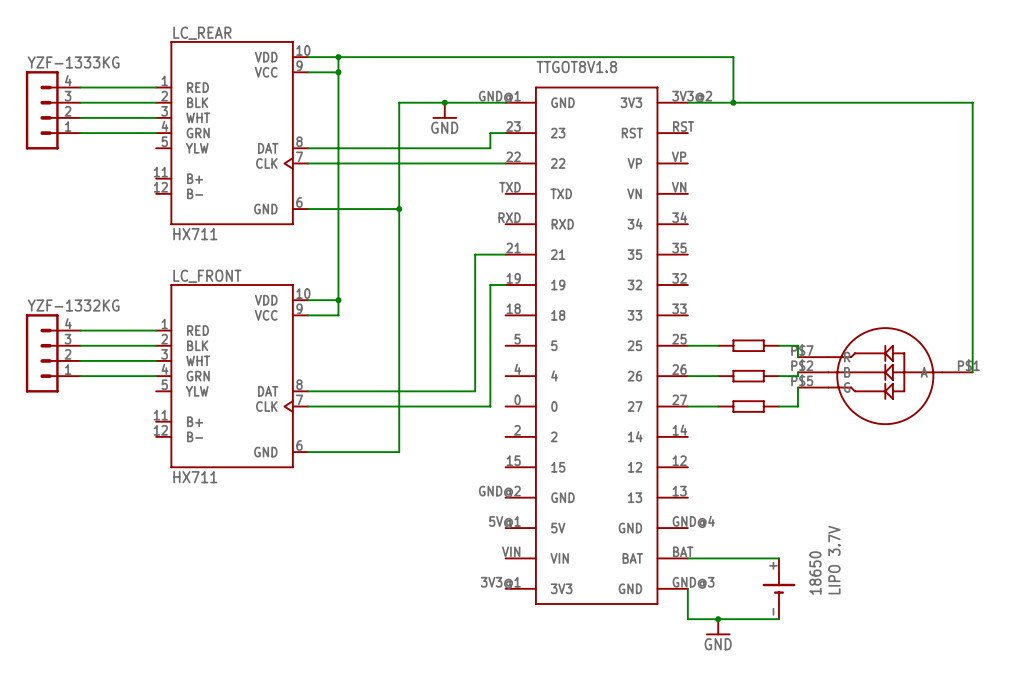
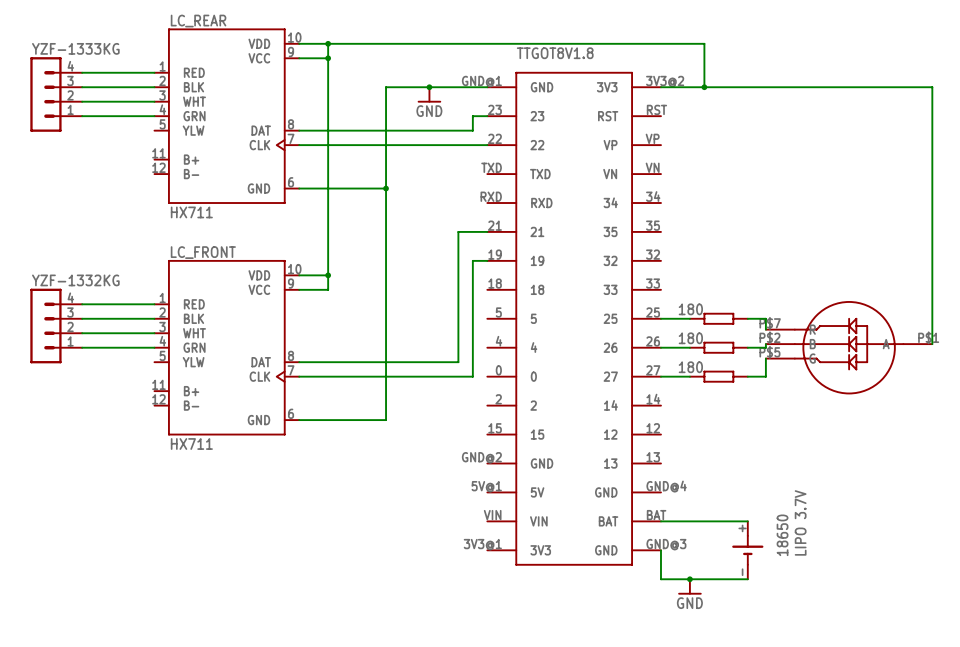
part text: none -> 180 (690, 309)
part text: none -> 180 (690, 338)
part text: none -> 180 (690, 367)

